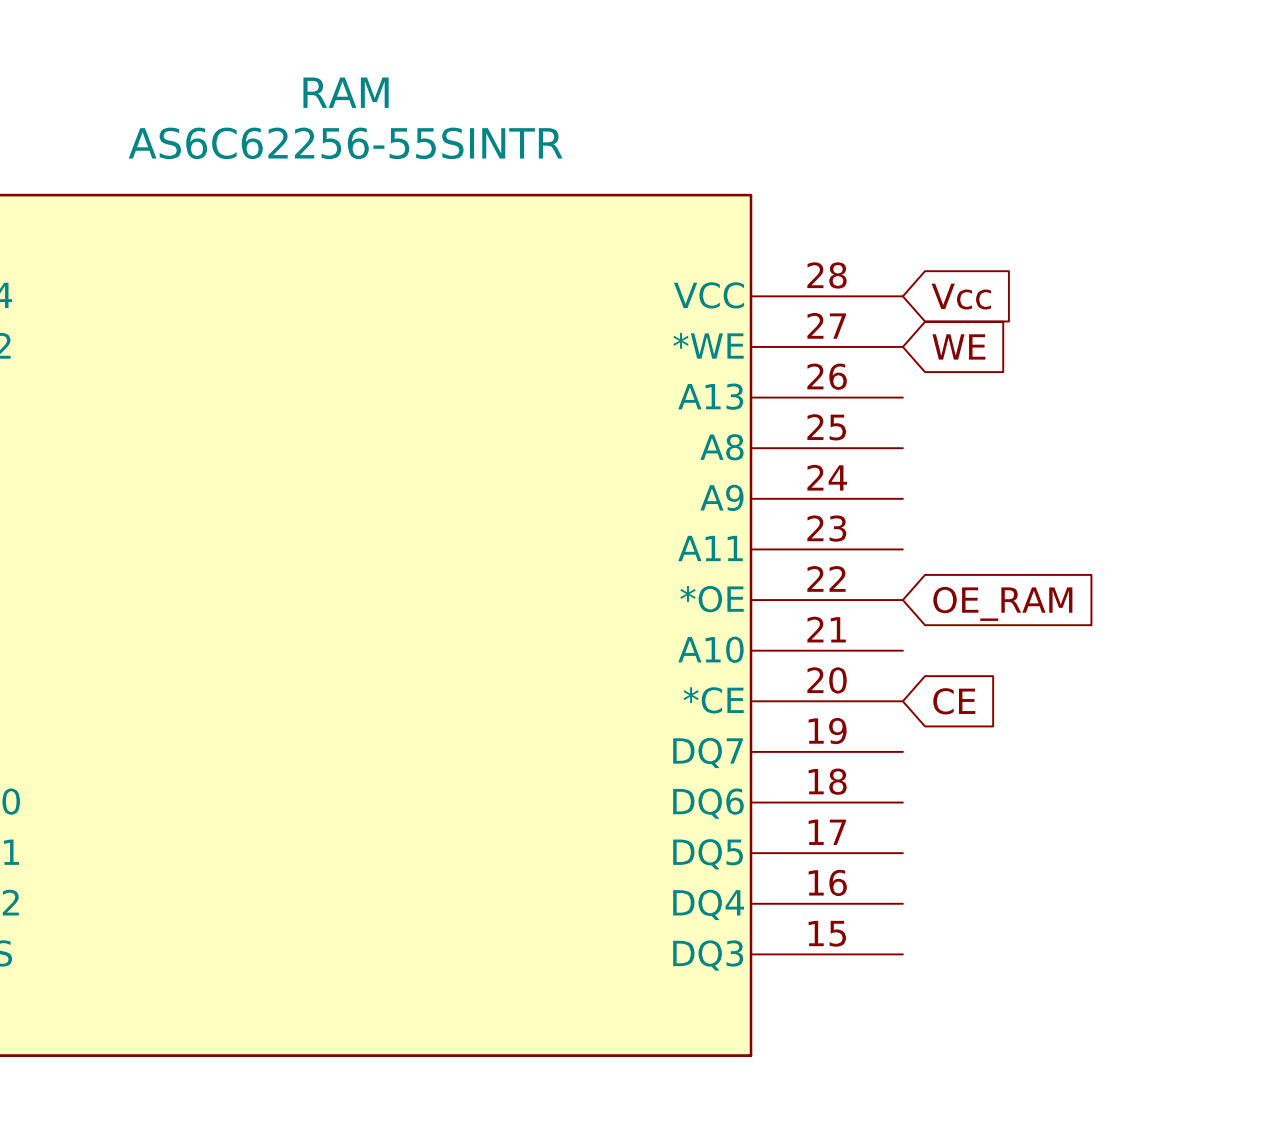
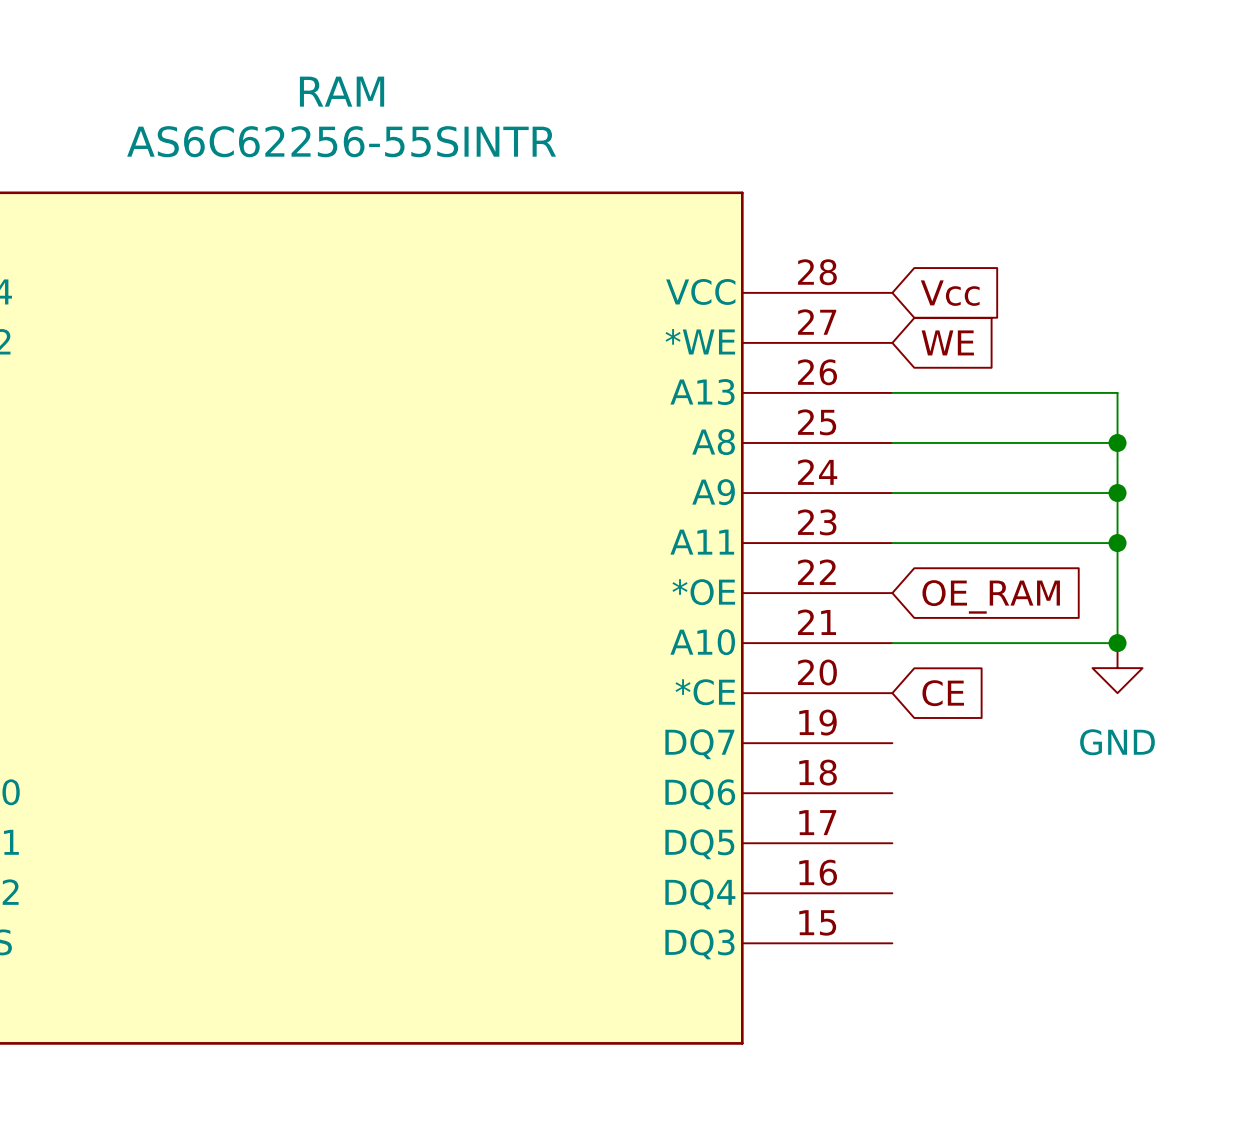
wire: none -> (892, 392) (1117, 392) (1117, 643) (892, 643)
wire: none -> (892, 442) (1117, 442)
junction: none -> (1117, 442)
wire: none -> (892, 493) (1117, 493)
junction: none -> (1117, 493)
wire: none -> (892, 543) (1117, 543)
junction: none -> (1117, 543)
junction: none -> (1117, 643)
power symbol: none -> GND (1117, 668)

